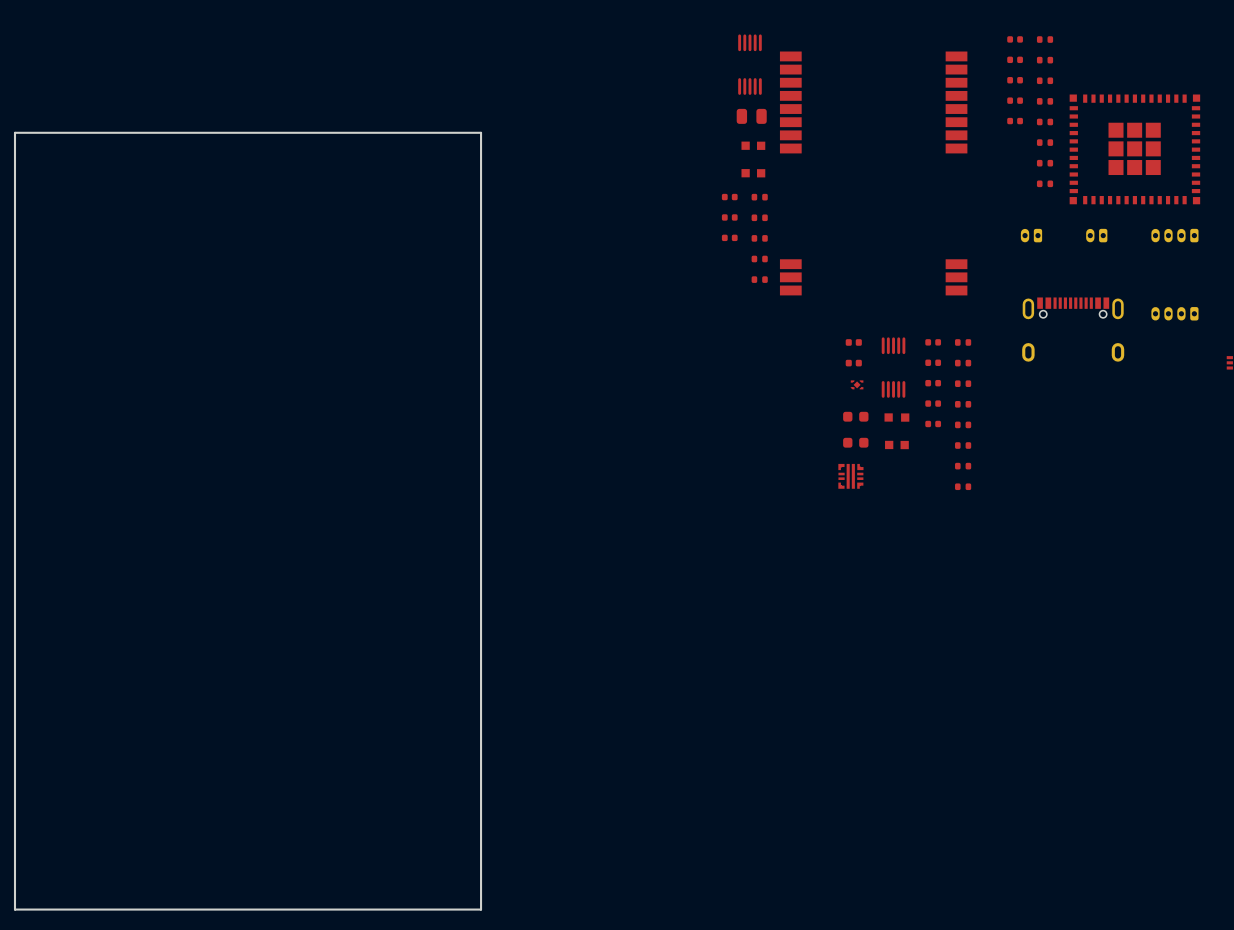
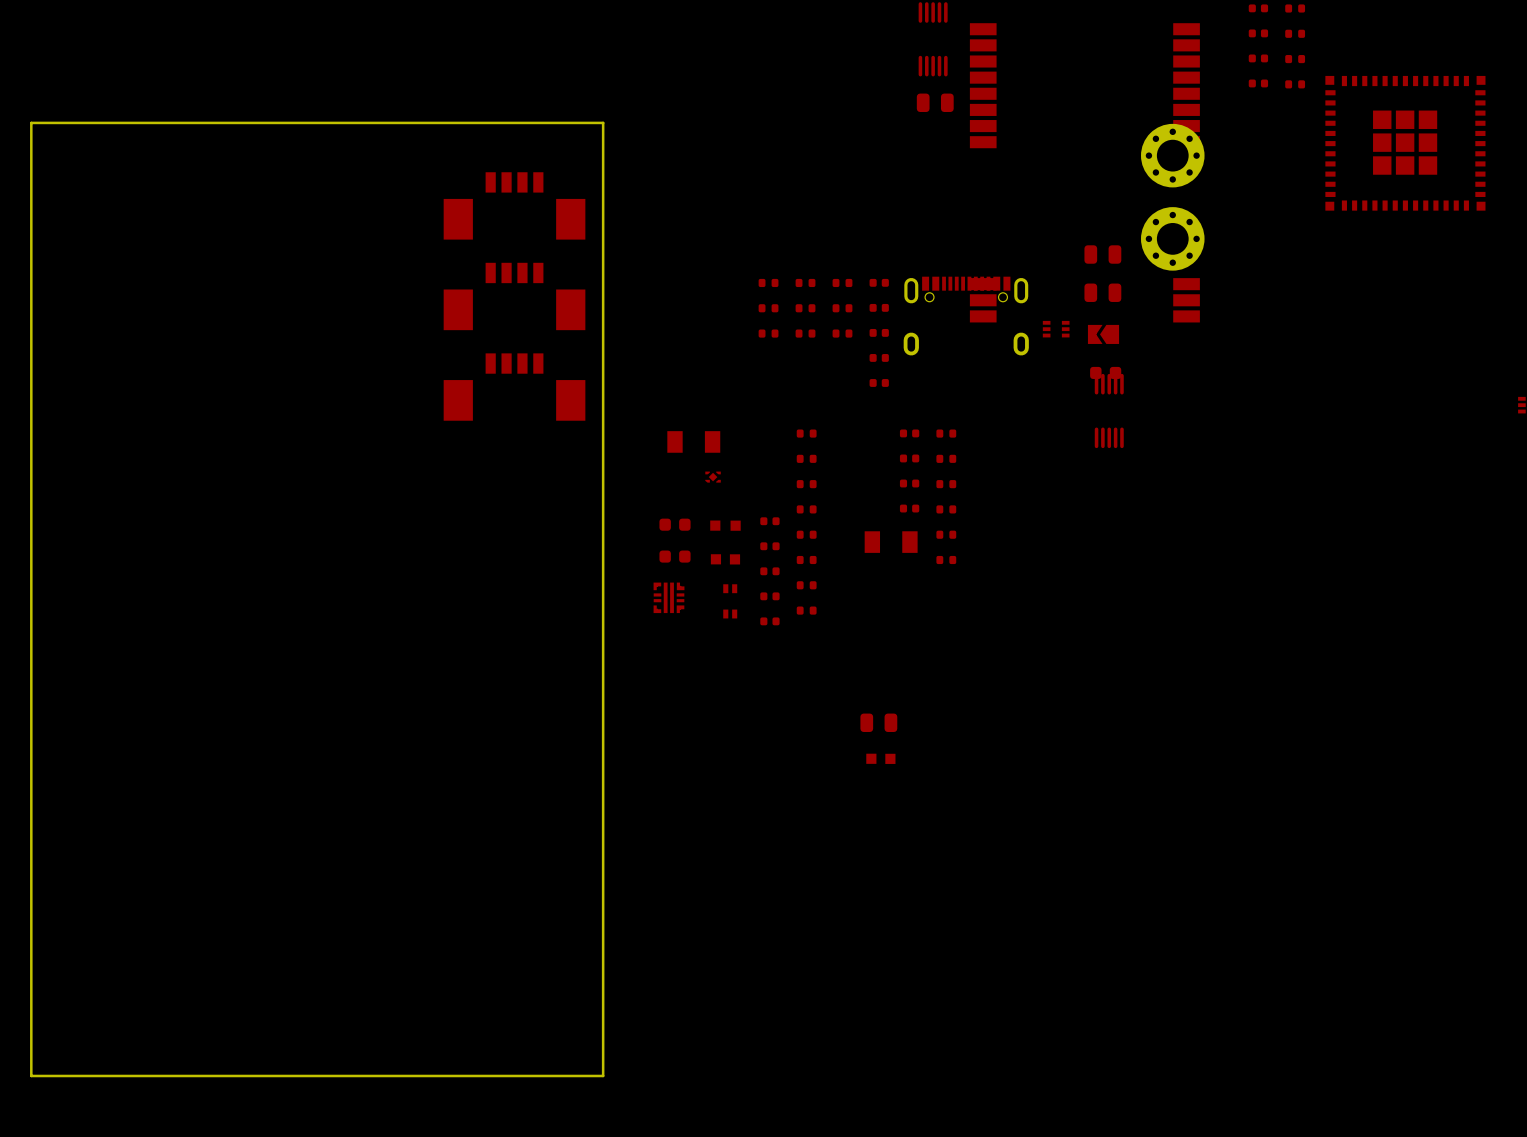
part: (1015, 121) -> none
part: (1045, 121) -> none
part: (1045, 142) -> none
part: (753, 145) -> none
part: none -> (1172, 155)
part: (1045, 163) -> none
part: (753, 173) -> none
part: (1045, 183) -> none
part: (729, 197) -> none
part: (759, 197) -> none
part: none -> (514, 205)
part: (729, 217) -> none
part: (759, 217) -> none
part: none -> (1172, 238)
part: (1031, 235) -> none
part: (1096, 235) -> none
part: (1174, 235) -> none
part: (729, 237) -> none
part: (759, 238) -> none
part: none -> (1102, 254)
part: (759, 258) -> none
part: none -> (768, 282)
part: none -> (805, 282)
part: none -> (842, 282)
part: none -> (879, 282)
part: none -> (1102, 292)
part: none -> (514, 296)
part: (759, 279) -> none
part: none -> (768, 308)
part: none -> (805, 308)
part: none -> (842, 308)
part: none -> (879, 307)
part: none -> (966, 316)
part: none -> (1056, 329)
part: none -> (879, 332)
part: none -> (768, 333)
part: none -> (805, 333)
part: none -> (842, 333)
part: none -> (1103, 334)
part: (1174, 313) -> none
part: none -> (879, 357)
part: (1073, 329) -> none
part: none -> (1105, 372)
part: (853, 342) -> none
part: (933, 342) -> none
part: (963, 342) -> none
part: none -> (879, 382)
part: none -> (514, 387)
part: (933, 362) -> none
part: (853, 363) -> none
part: (963, 363) -> none
part: (933, 383) -> none
part: (963, 383) -> none
part: (857, 384) -> none
part: none -> (806, 433)
part: none -> (909, 433)
part: none -> (946, 433)
part: none -> (693, 441)
part: (933, 403) -> none
part: (963, 404) -> none
part: none -> (806, 458)
part: none -> (909, 458)
part: none -> (946, 458)
part: (855, 416) -> none
part: (896, 417) -> none
part: none -> (713, 477)
part: (933, 423) -> none
part: (963, 424) -> none
part: none -> (909, 483)
part: none -> (806, 484)
part: none -> (946, 484)
part: (855, 442) -> none
part: (896, 444) -> none
part: (963, 445) -> none
part: none -> (806, 509)
part: none -> (909, 508)
part: none -> (946, 509)
part: none -> (769, 521)
part: none -> (675, 524)
part: none -> (725, 525)
part: (963, 466) -> none
part: none -> (806, 534)
part: none -> (946, 534)
part: none -> (891, 542)
part: (850, 476) -> none
part: none -> (769, 546)
part: none -> (675, 556)
part: (963, 486) -> none
part: none -> (725, 559)
part: none -> (806, 560)
part: none -> (946, 560)
part: none -> (769, 571)
part: none -> (806, 585)
part: none -> (730, 588)
part: none -> (769, 596)
part: none -> (669, 597)
part: none -> (806, 610)
part: none -> (730, 614)
part: none -> (769, 621)
part: none -> (878, 722)
part: none -> (880, 758)

